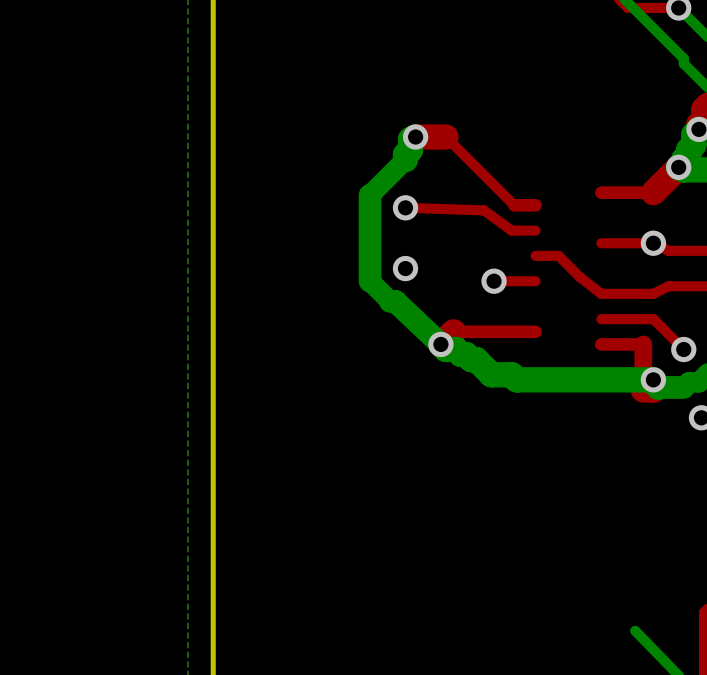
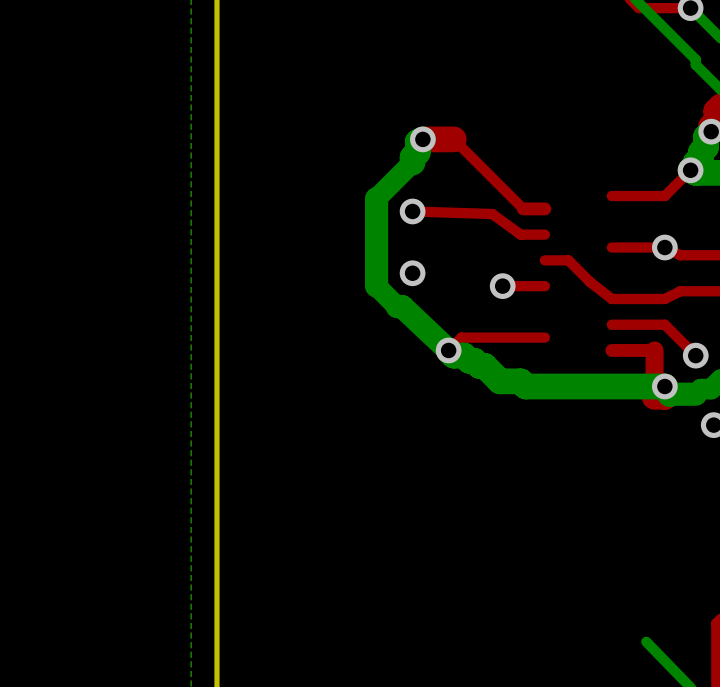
top track width: thick (678, 167) (653, 192) (601, 192) -> thin (690, 170) (664, 196) (611, 196)
top track width: thick (535, 331) (453, 331) (440, 344) -> thin (544, 337) (461, 337) (448, 350)

